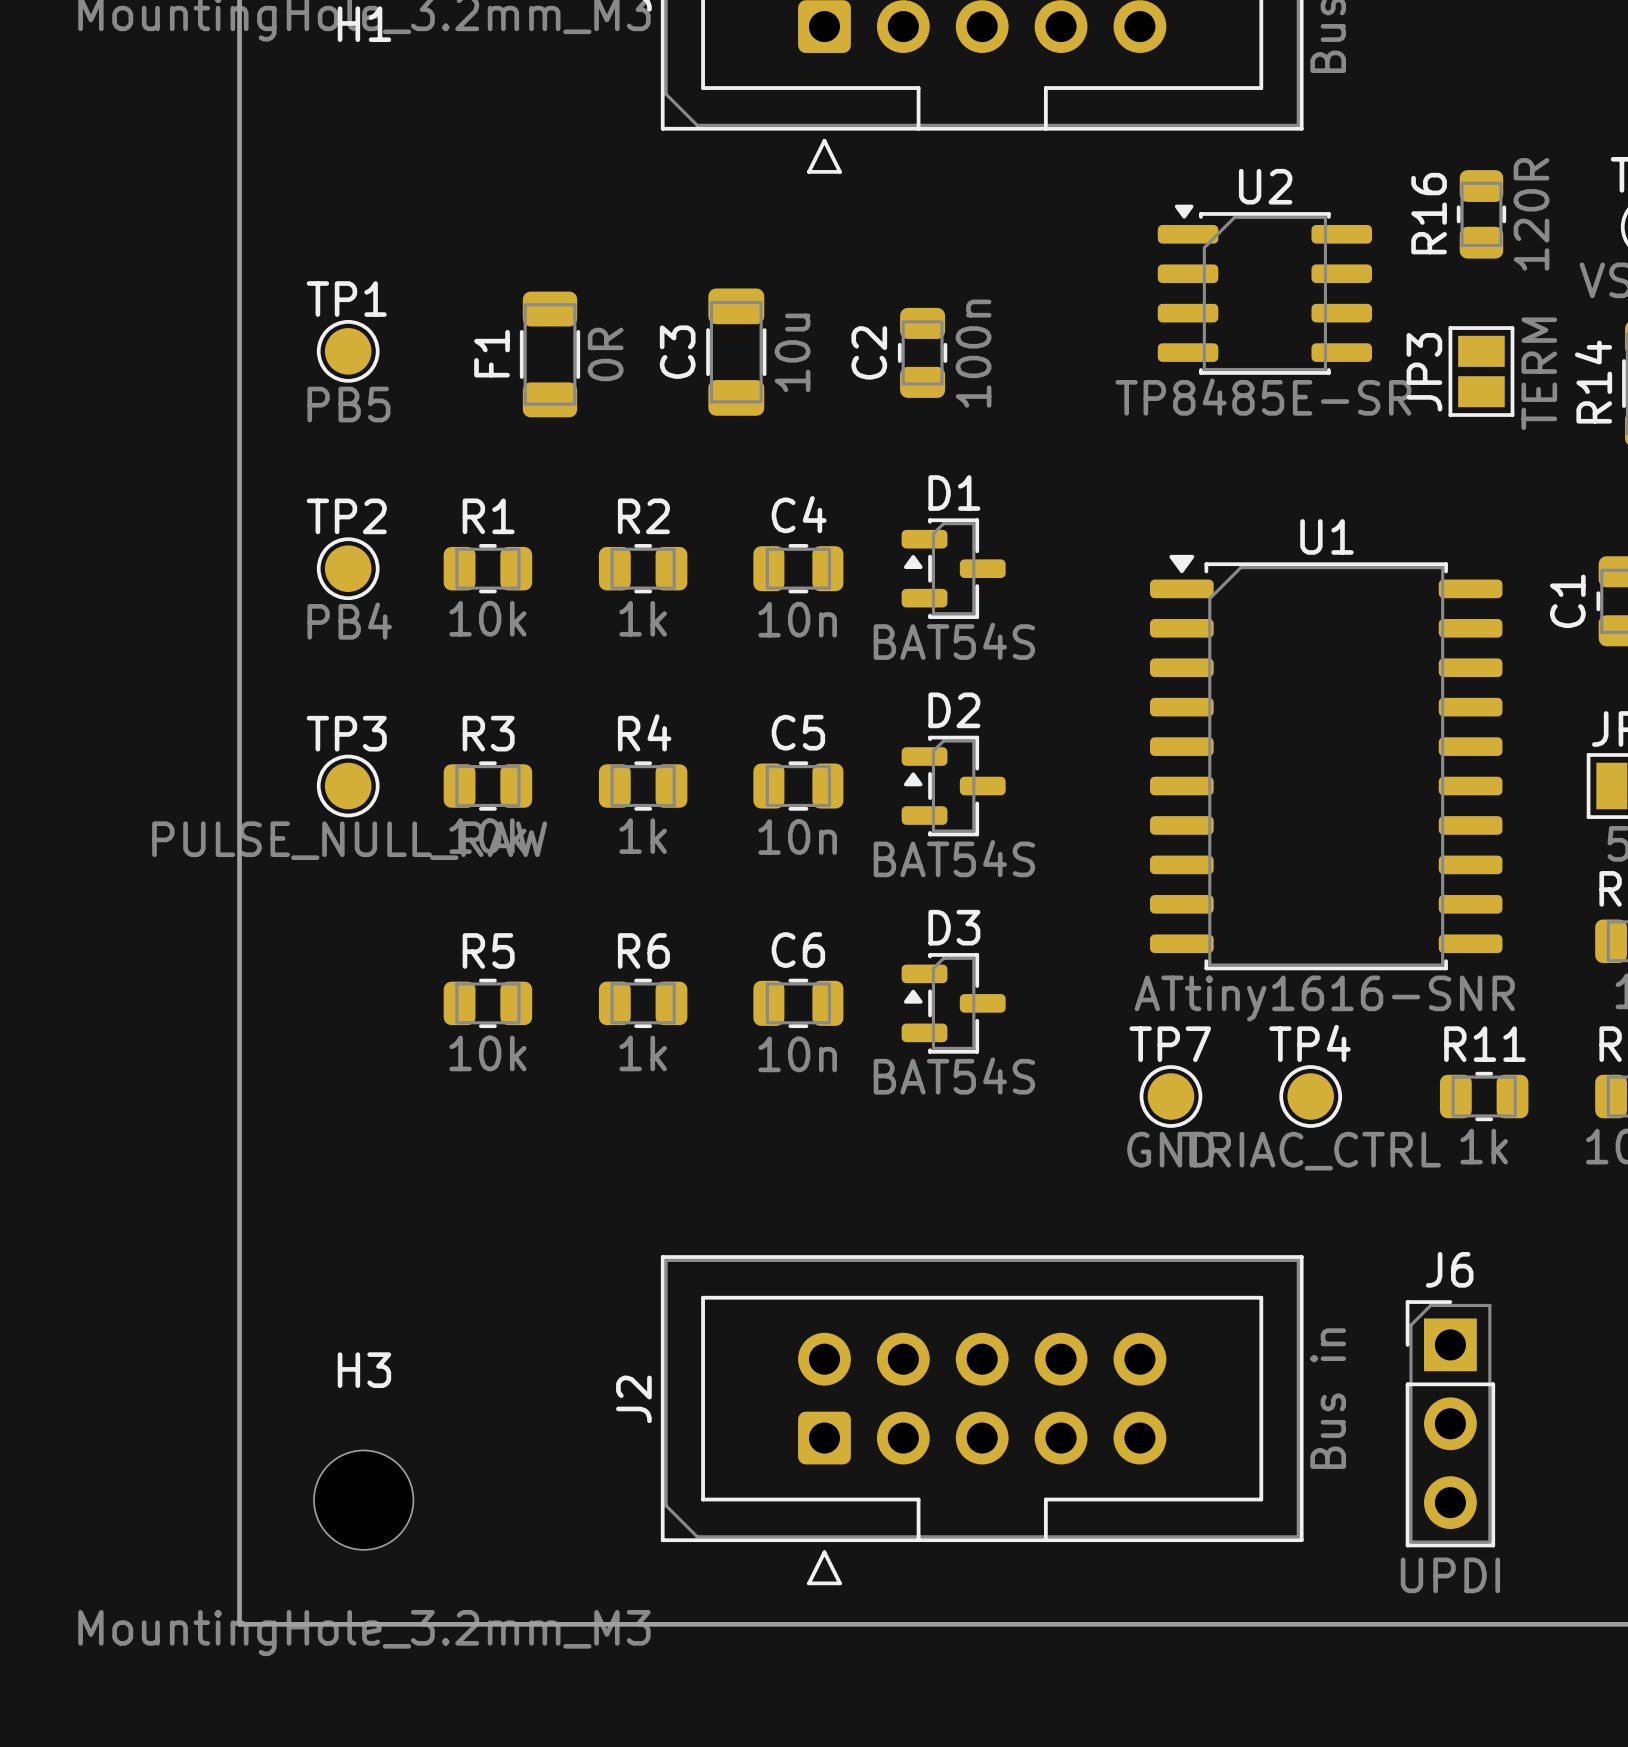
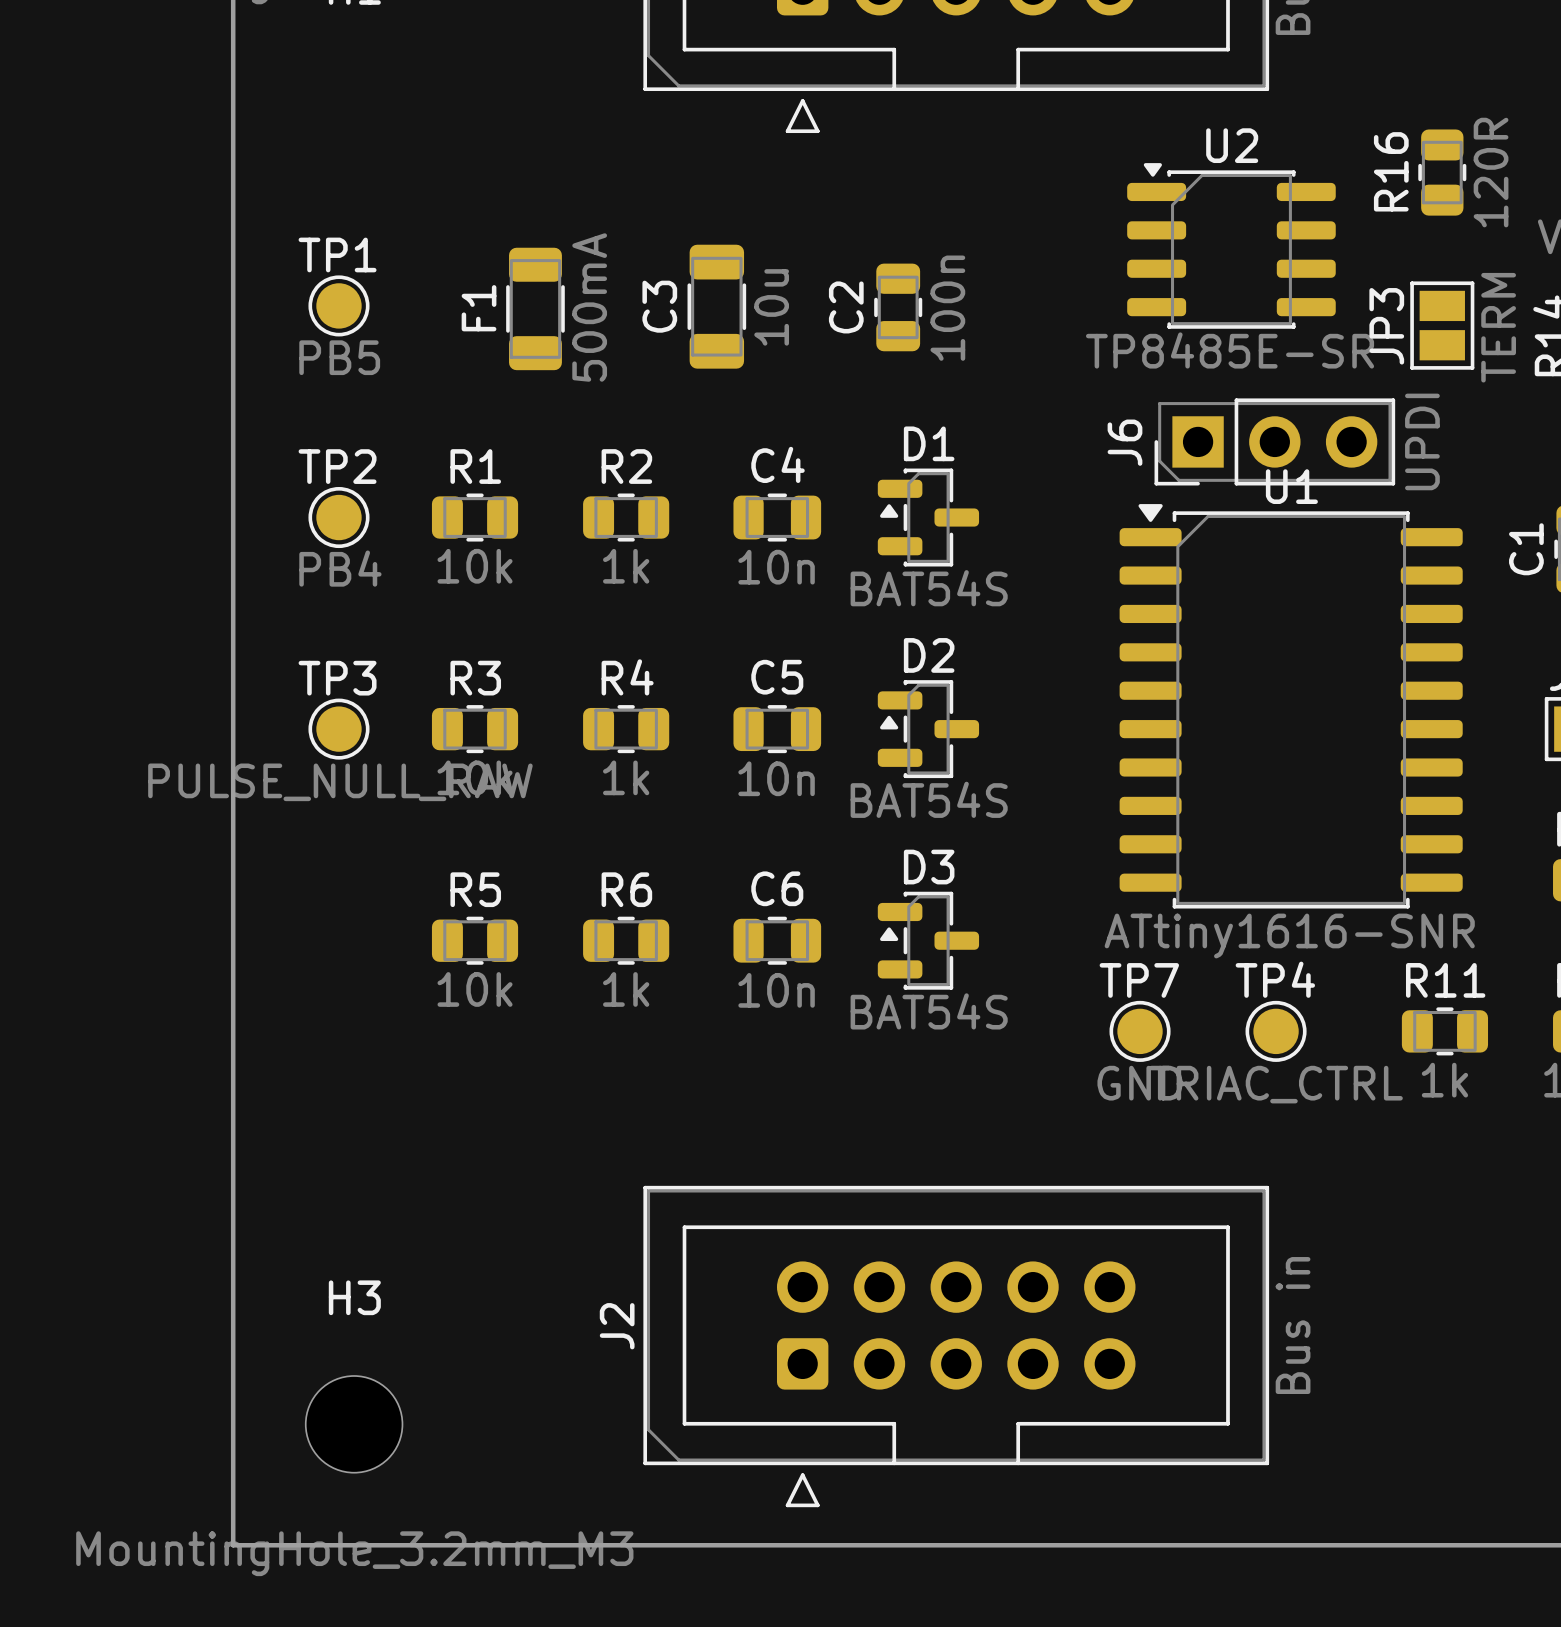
F1 value: 0R (605, 354) -> 500mA (589, 307)
J6 rotation: 0° (1450, 1423) -> 90° counterclockwise (1274, 441)
J6 position: (1450, 1423) -> (1274, 441)

